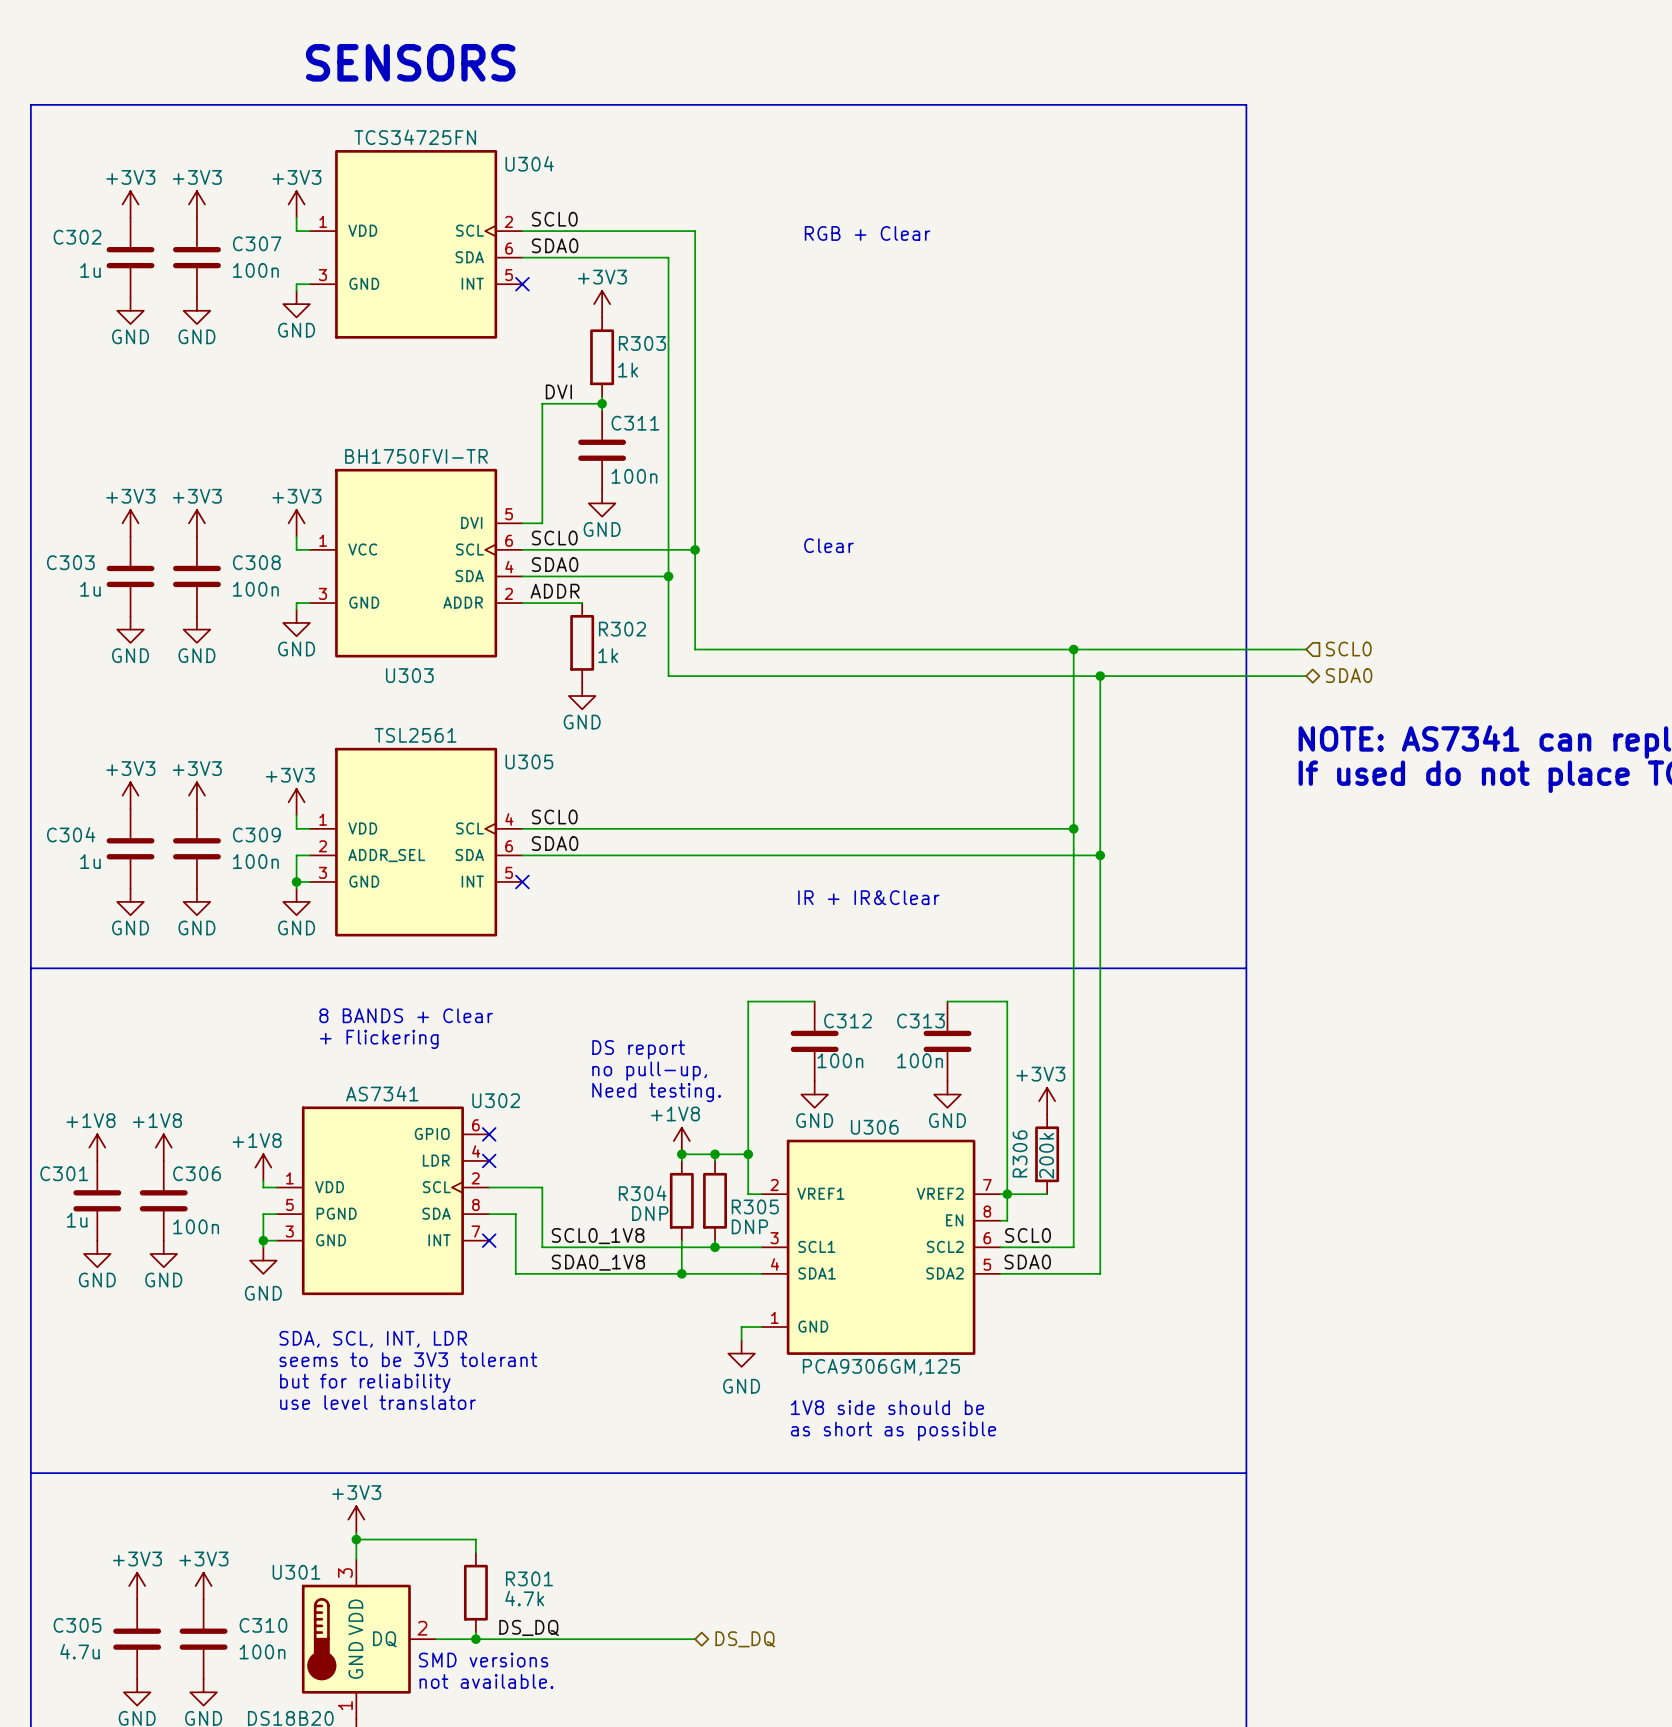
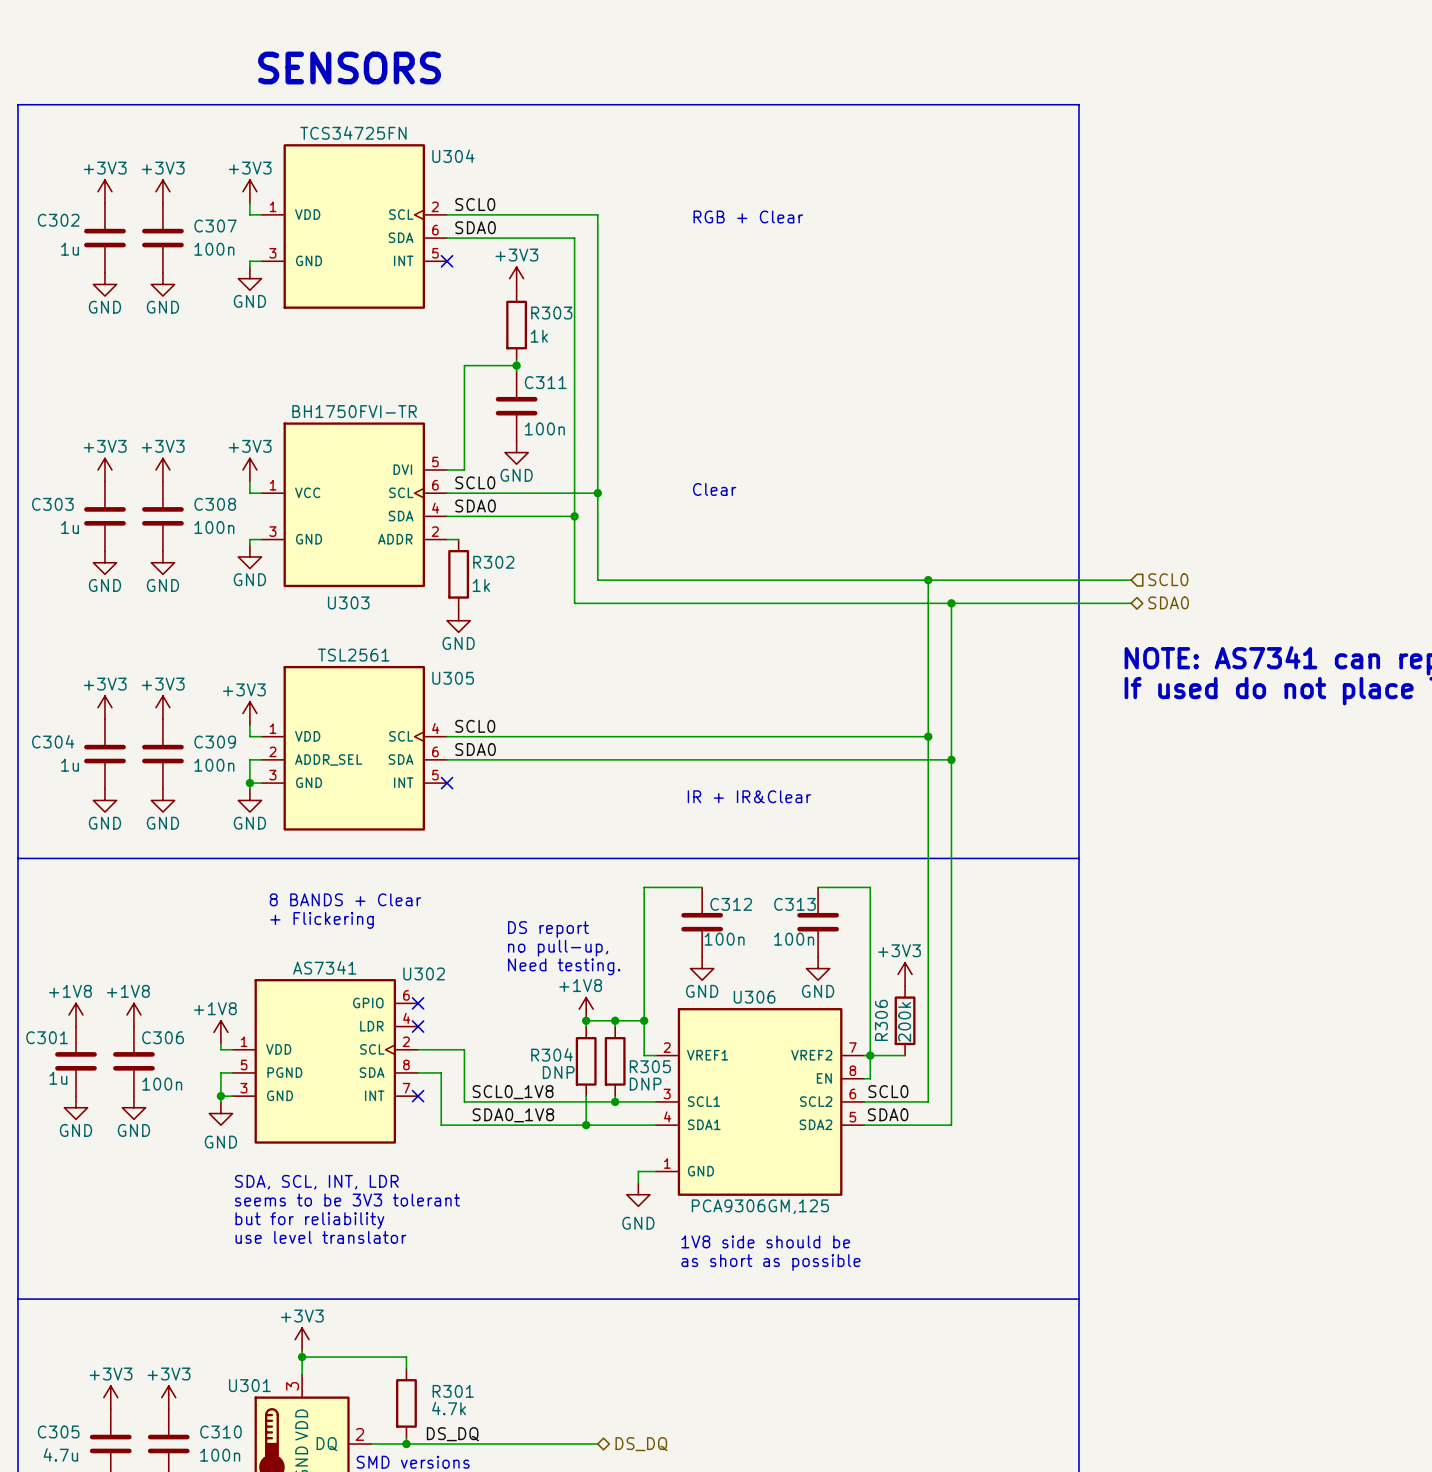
label: DVI (558, 391) -> none
label: ADDR (555, 591) -> none
wire: (535, 603) (582, 603) -> none
R302 position: (582, 642) -> (458, 574)
power symbol position: GND (582, 696) -> GND (458, 620)

